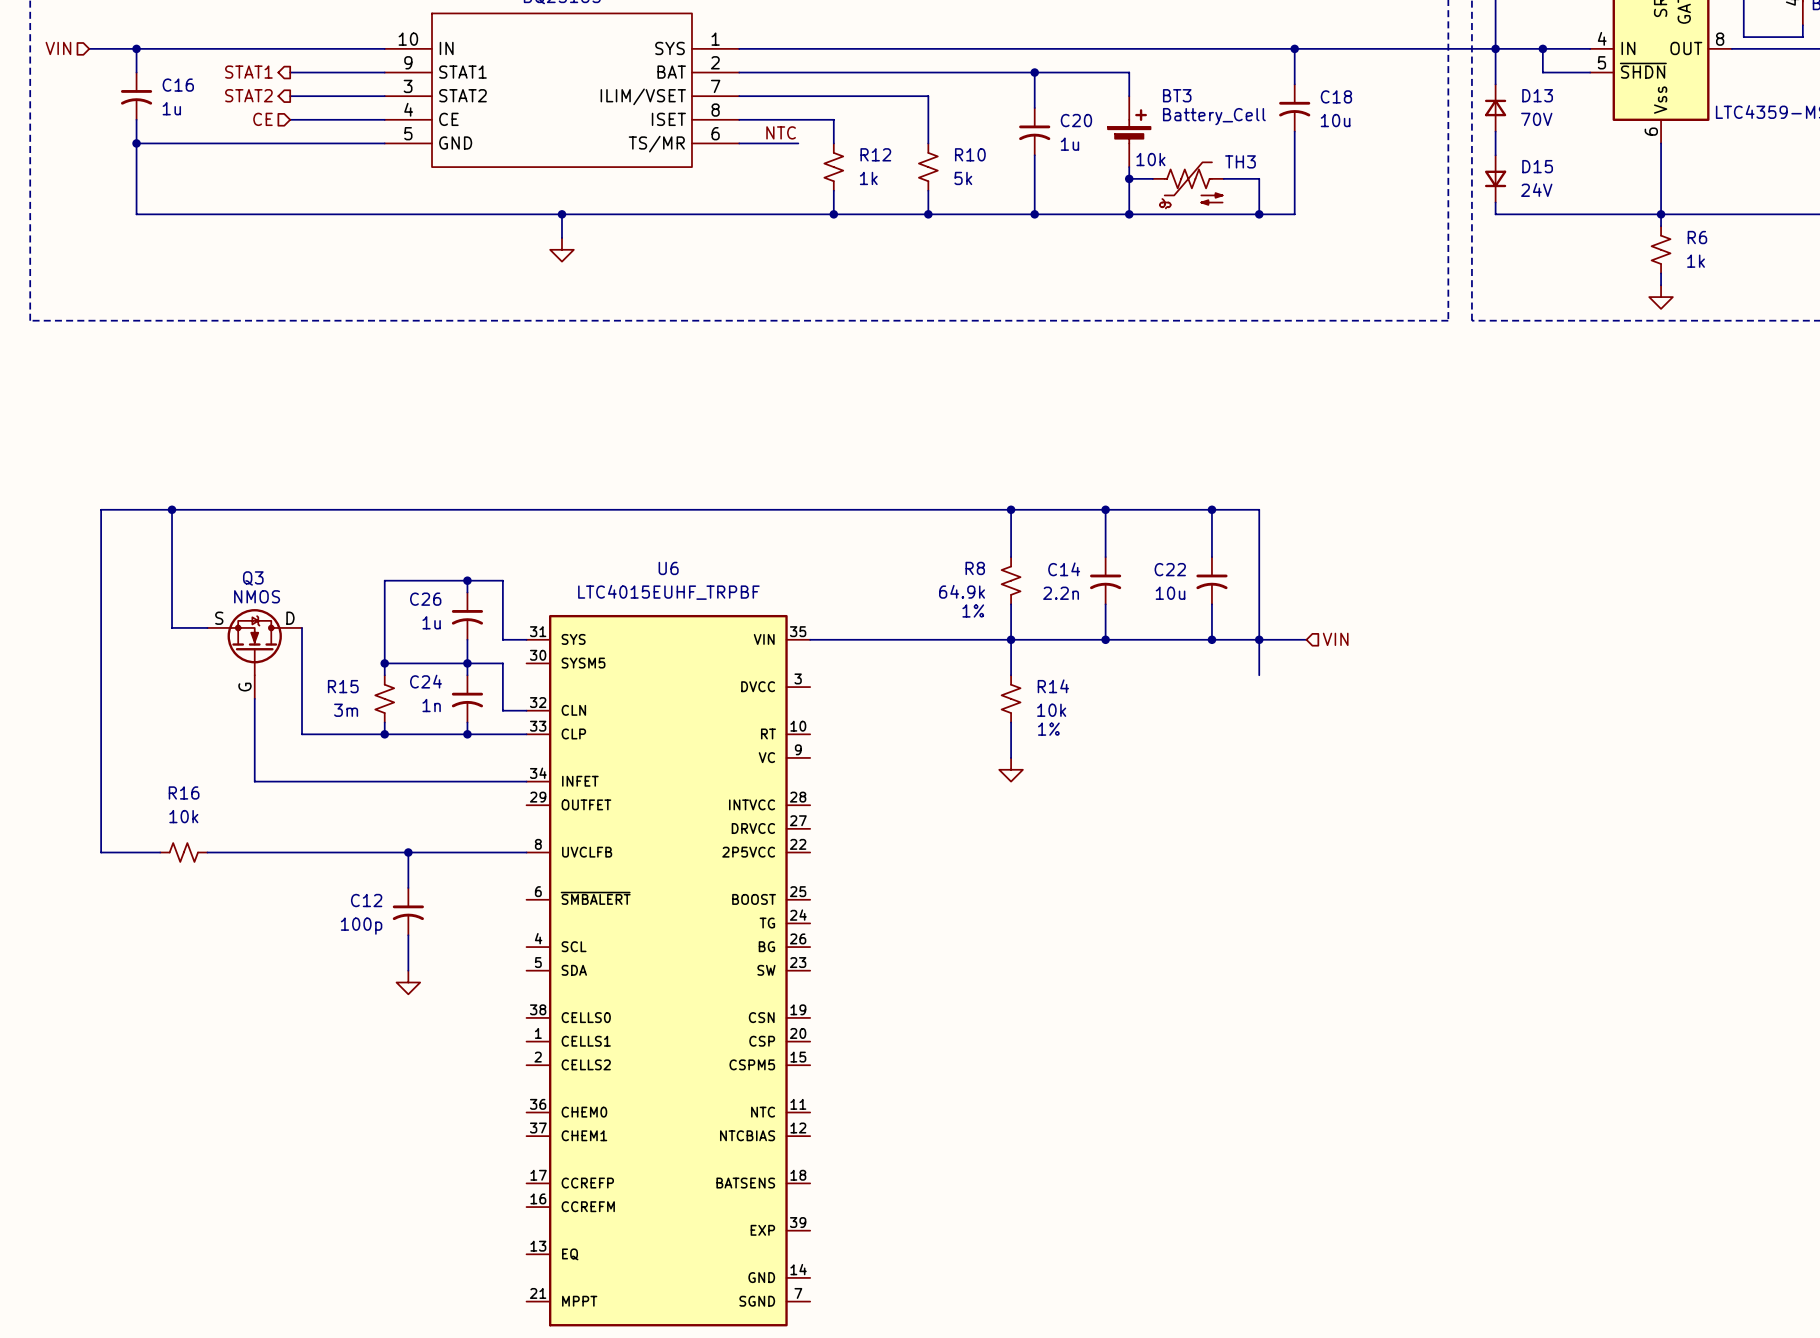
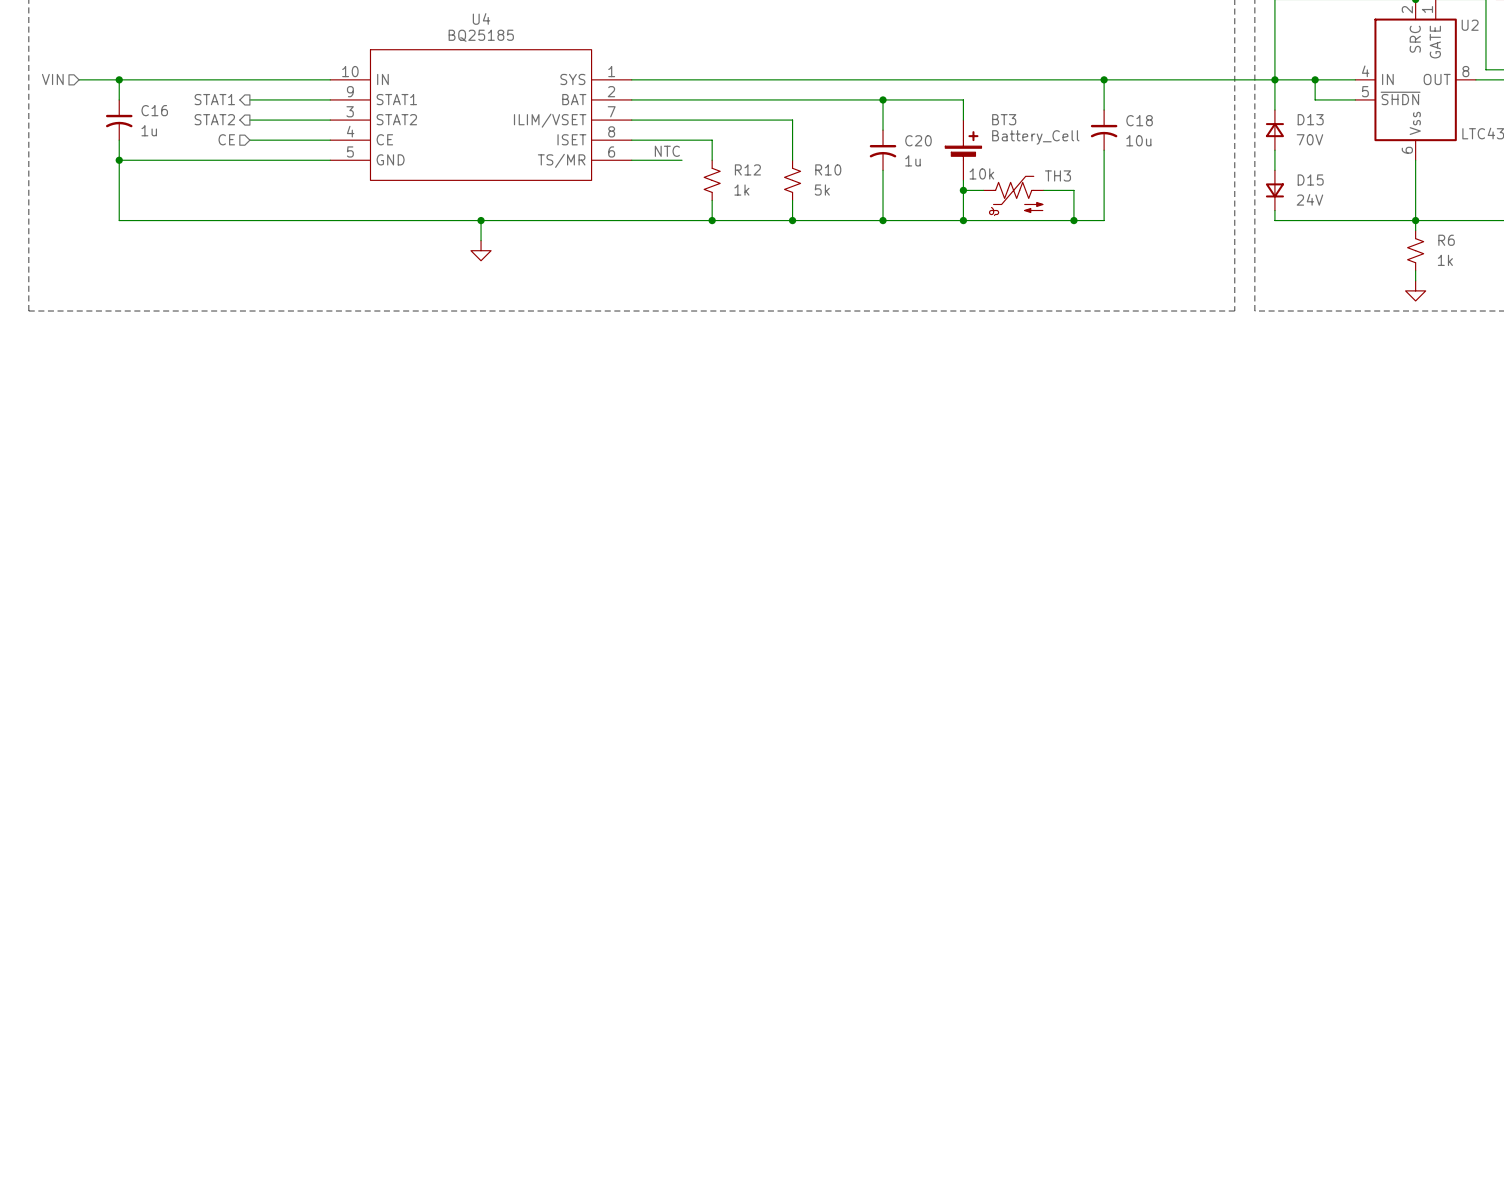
wire: (172, 509) (172, 627) (207, 627) -> none
junction: (172, 509) -> none
wire: (1011, 509) (1011, 557) -> none
junction: (1011, 509) -> none
wire: (1105, 509) (1105, 557) -> none
junction: (1105, 509) -> none
wire: (1211, 509) (1211, 557) -> none
junction: (1211, 509) -> none
wire: (467, 580) (467, 592) -> none
junction: (467, 580) -> none
R8: 64.9k (1011, 580) -> none
C14: 2.2n (1105, 580) -> none
C22: 10u (1211, 580) -> none
wire: (1011, 604) (1011, 675) -> none
wire: (1105, 604) (1105, 639) -> none
wire: (1211, 604) (1211, 639) -> none
C26: 1u (467, 616) -> none
wire: (302, 627) (302, 734) (526, 734) -> none
wire: (467, 639) (467, 675) -> none
wire: (526, 639) (502, 639) (502, 580) (384, 580) (384, 675) -> none
wire: (810, 639) (1306, 639) -> none
junction: (1011, 639) -> none
junction: (1105, 639) -> none
junction: (1211, 639) -> none
junction: (1259, 639) -> none
hierarchical label: VIN (1335, 639) -> none
Q3: NMOS (254, 653) -> none
wire: (384, 663) (502, 663) (502, 710) (526, 710) -> none
junction: (384, 663) -> none
junction: (467, 663) -> none
wire: (1259, 675) (1259, 509) (101, 509) (101, 852) (160, 852) -> none
wire: (254, 698) (254, 781) (526, 781) -> none
R15: 3m (384, 698) -> none
C24: 1n (467, 698) -> none
R14: 10k (1011, 698) -> none
wire: (384, 722) (384, 734) -> none
wire: (467, 722) (467, 734) -> none
wire: (1011, 722) (1011, 757) -> none
junction: (384, 734) -> none
junction: (467, 734) -> none
power symbol: (1011, 769) -> none
R16: 10k (183, 852) -> none
wire: (207, 852) (526, 852) -> none
wire: (408, 852) (408, 887) -> none
junction: (408, 852) -> none
C12: 100p (408, 911) -> none
wire: (408, 935) (408, 970) -> none
U6: LTC4015EUHF_TRPBF (668, 970) -> none
power symbol: (408, 982) -> none

